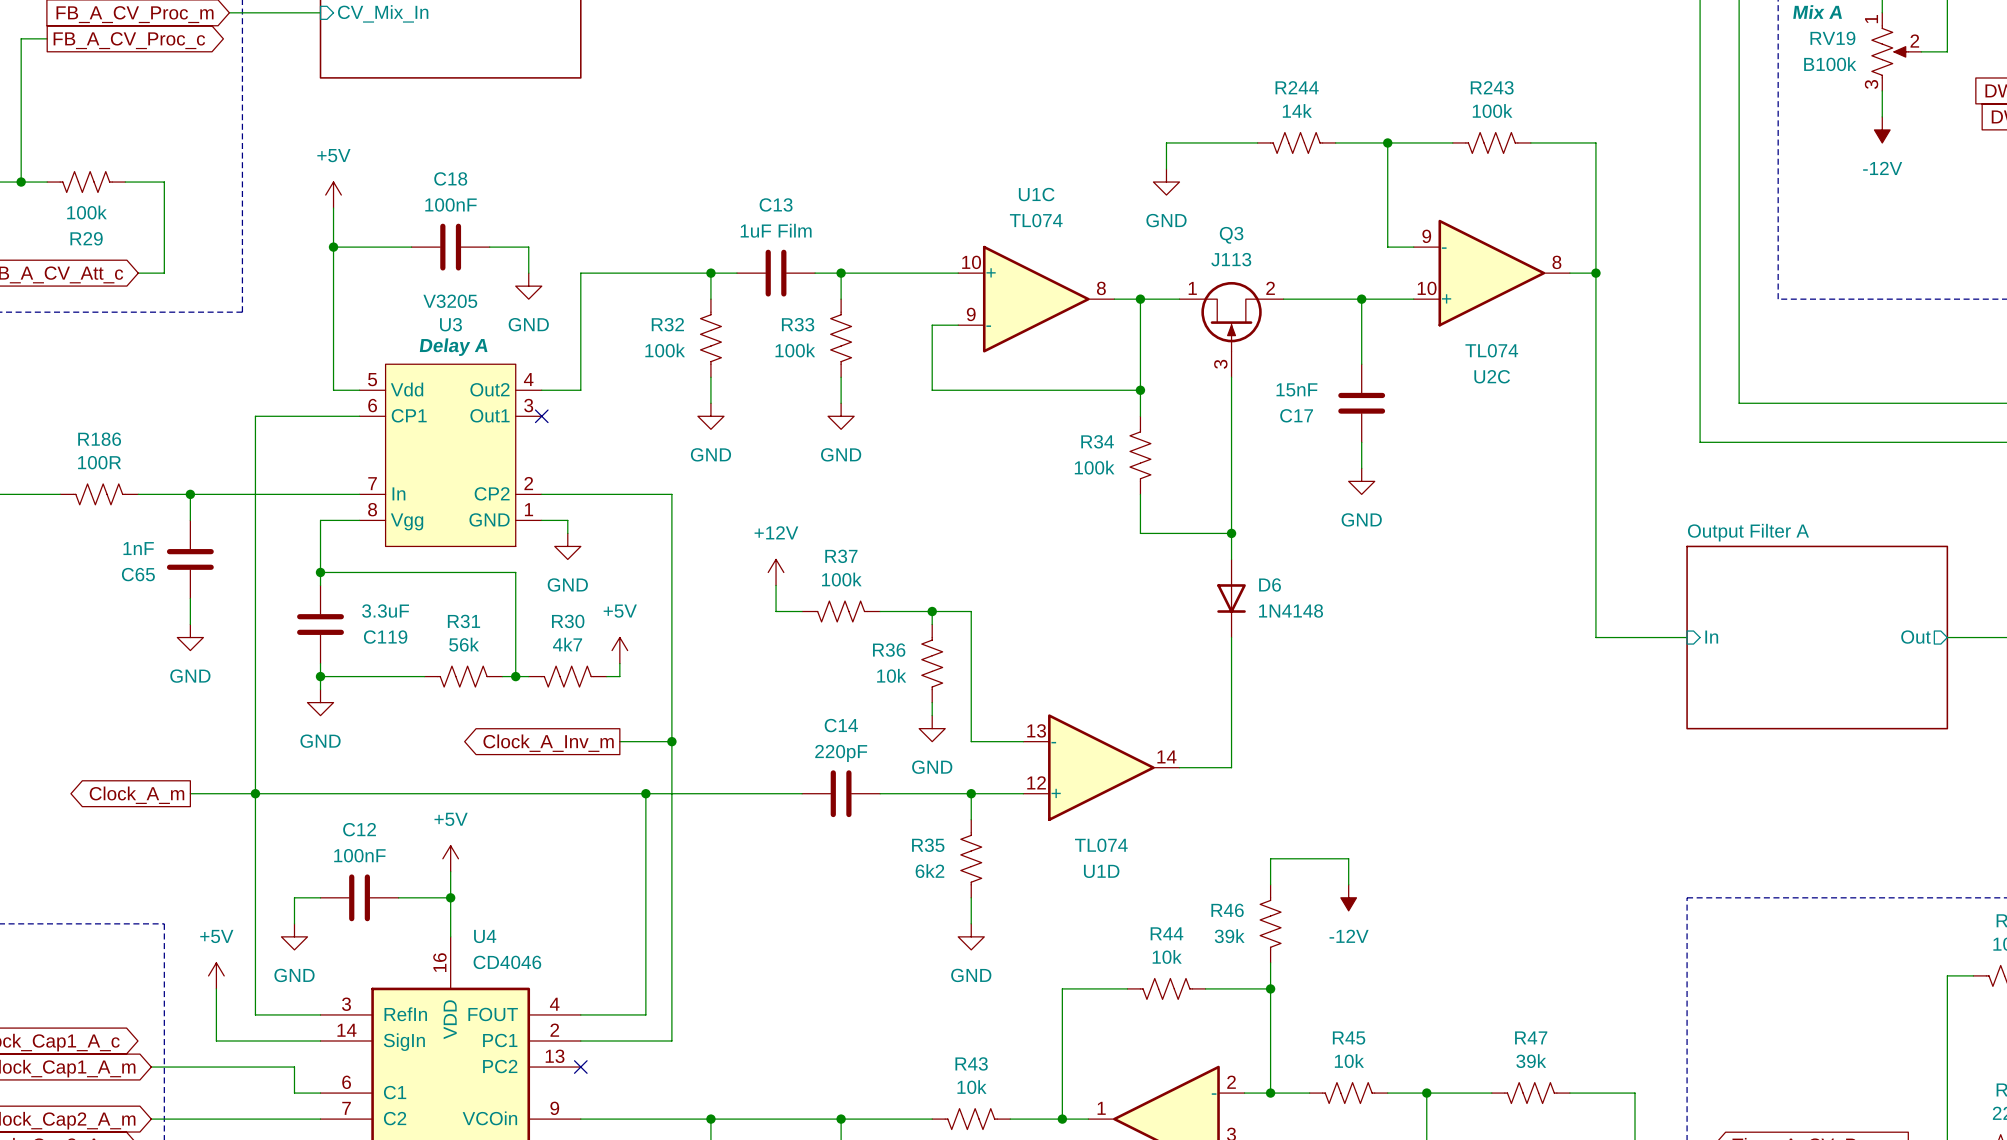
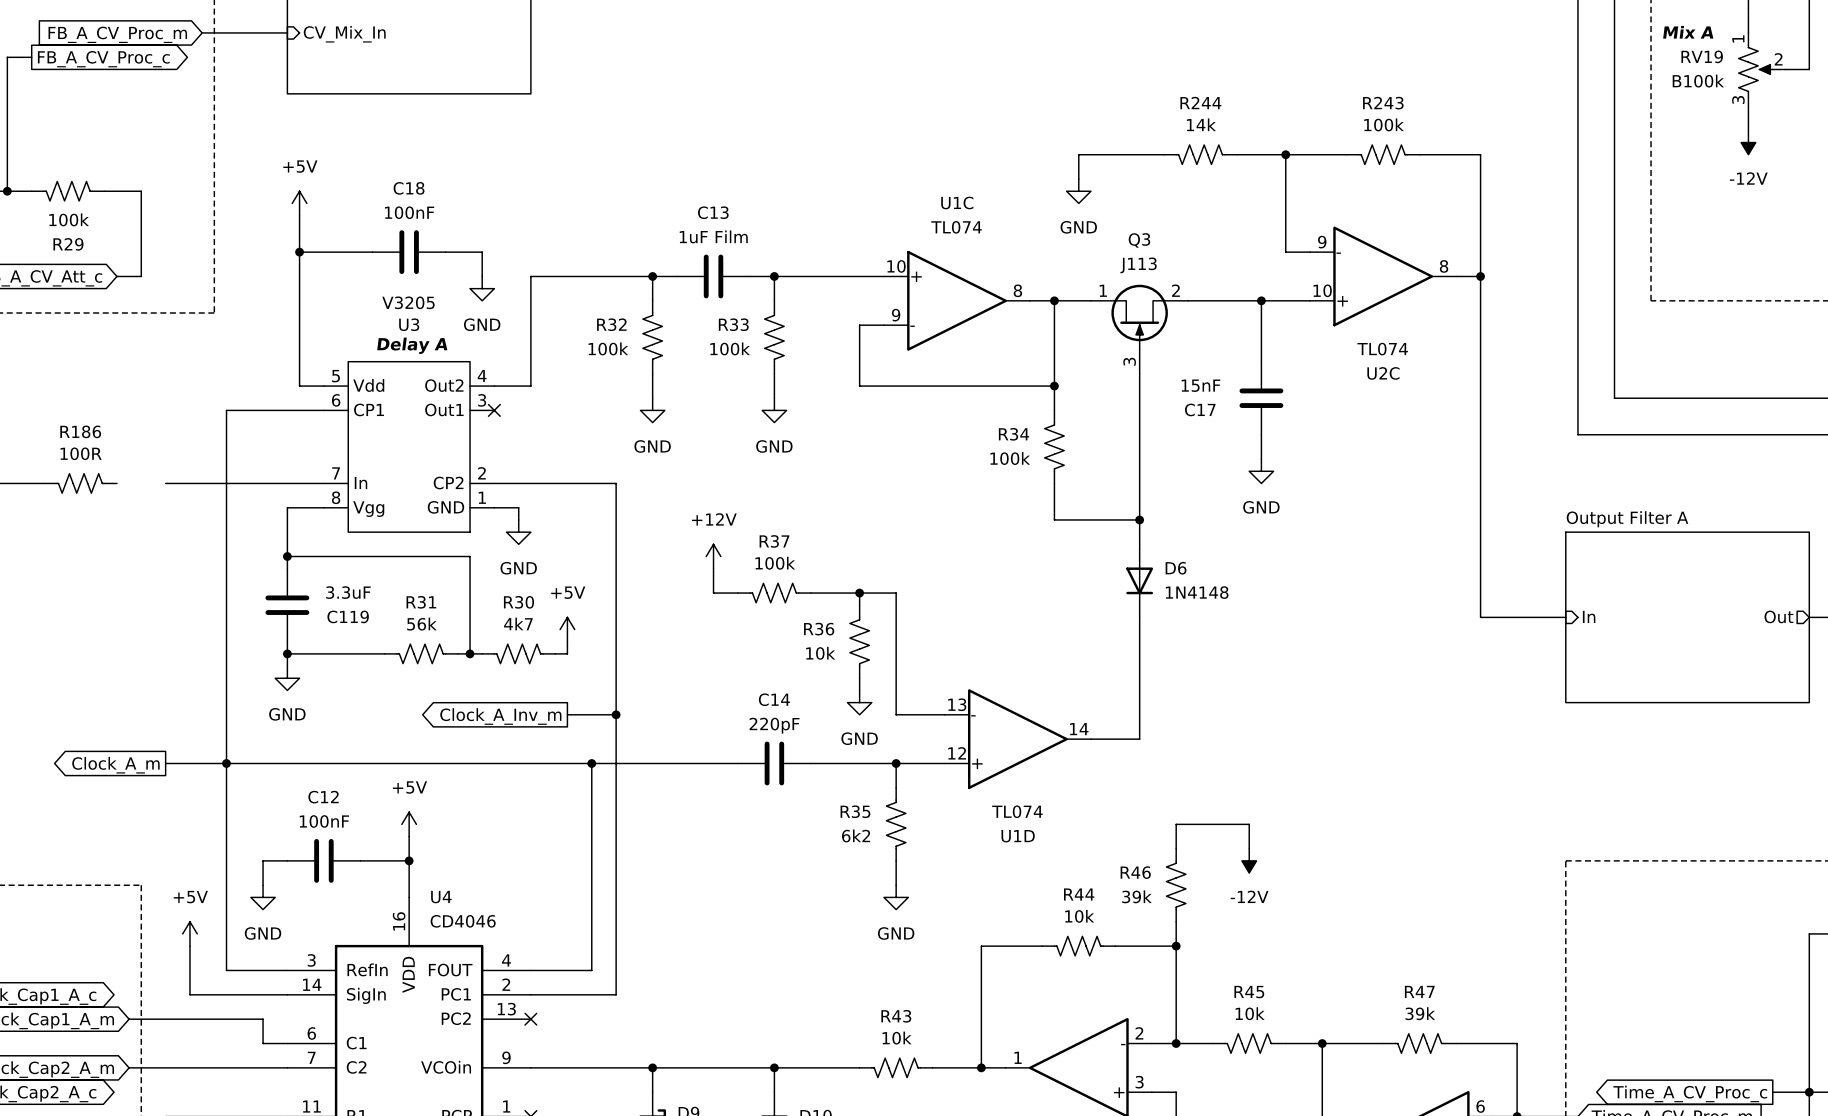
wire: (138, 494) (190, 494) (190, 520) -> none
junction: (190, 494) -> none
C65: 1nF (190, 559) -> none
wire: (190, 598) (190, 624) -> none
power symbol: GND (190, 637) -> none

